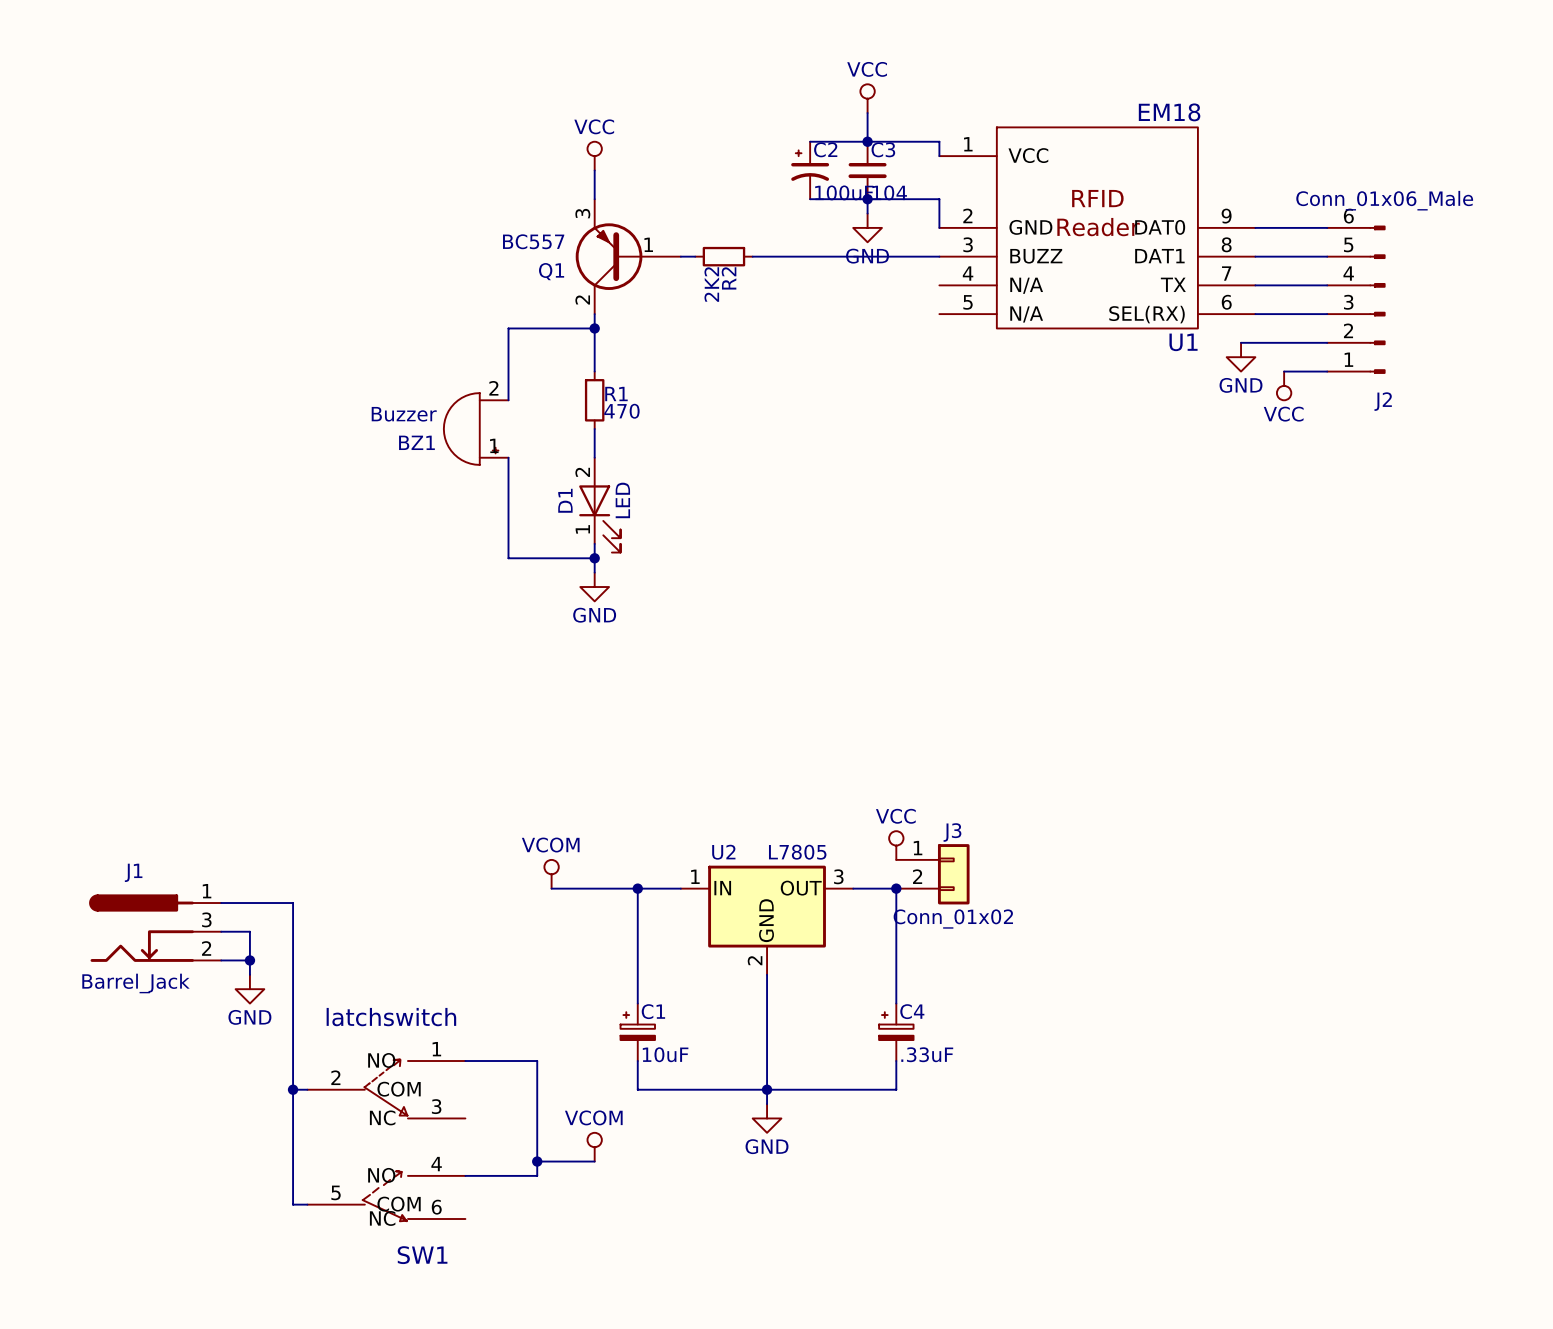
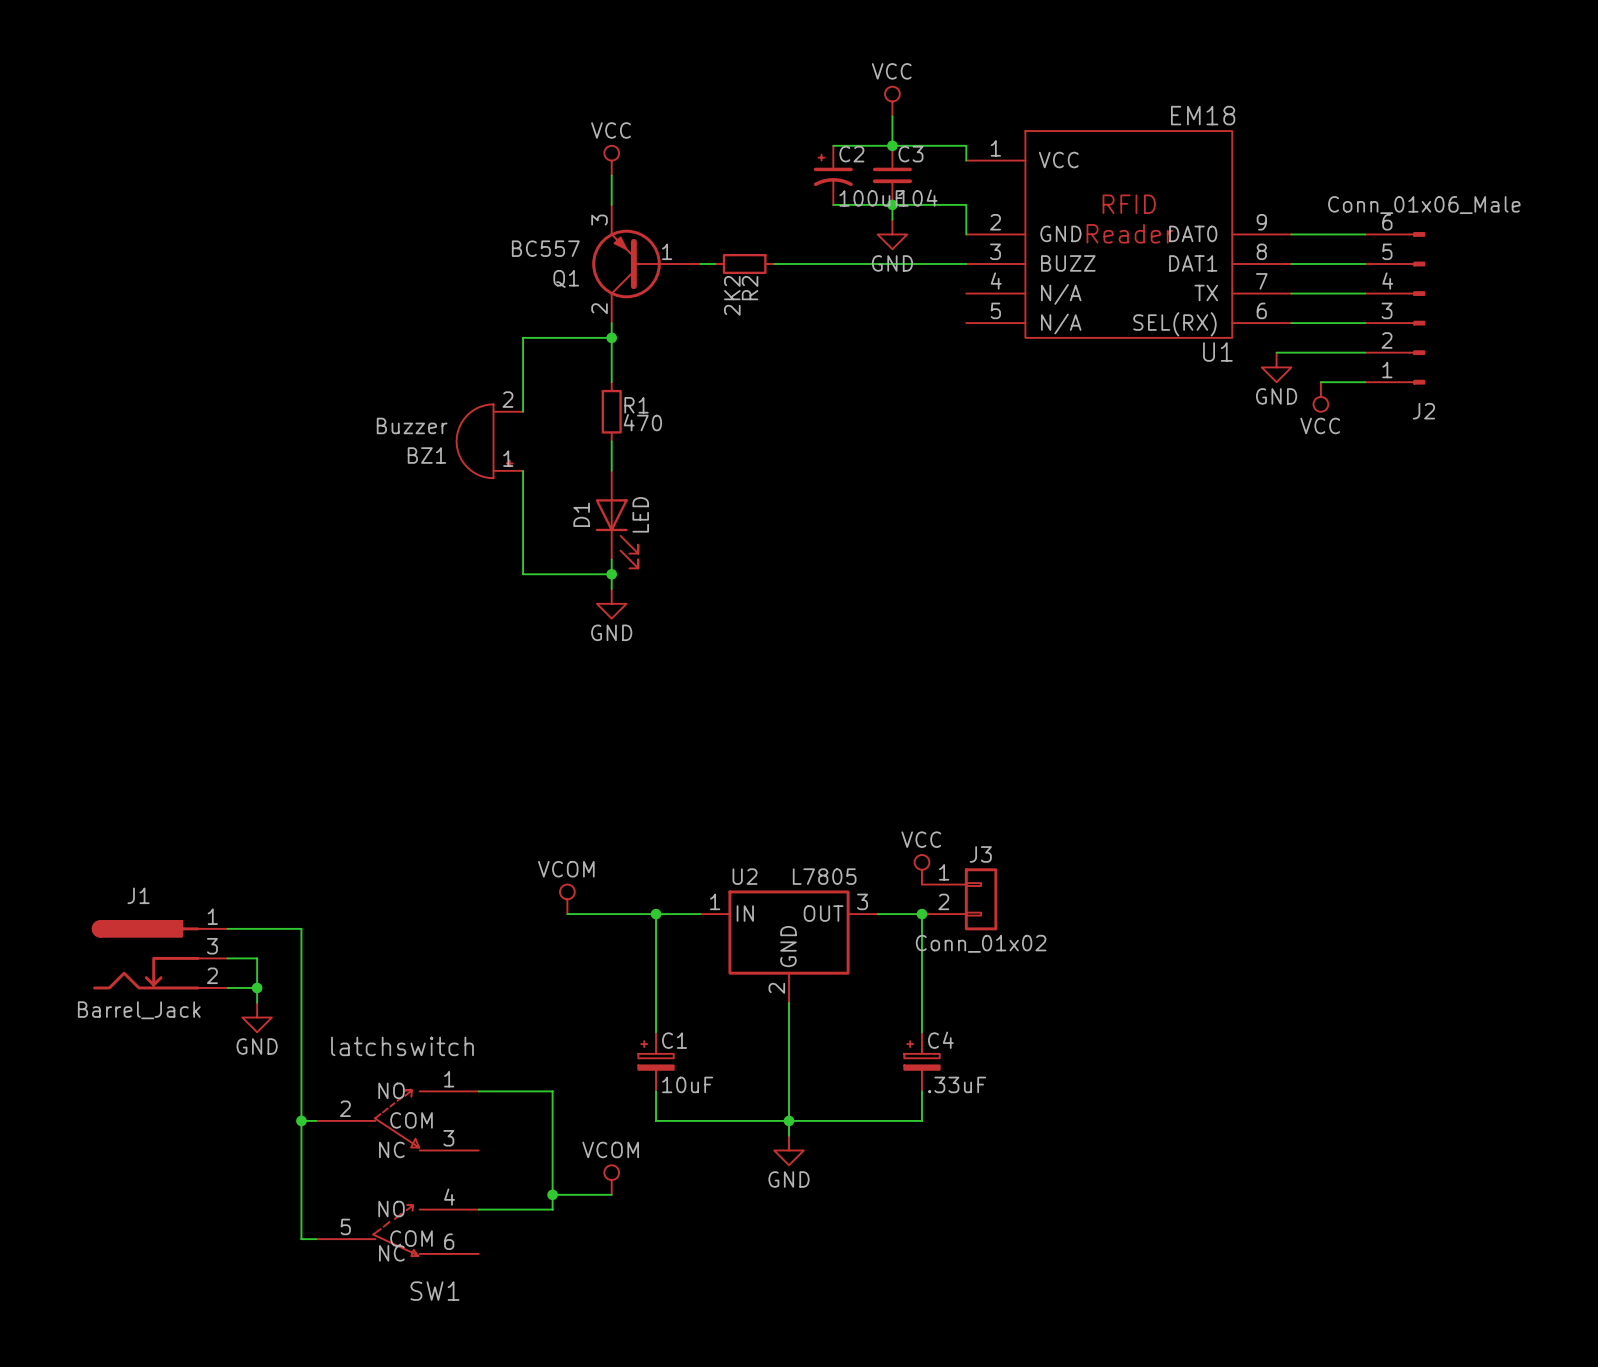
D1 pin number: 2 (582, 472) -> none
D1 pin number: 1 (582, 529) -> none

